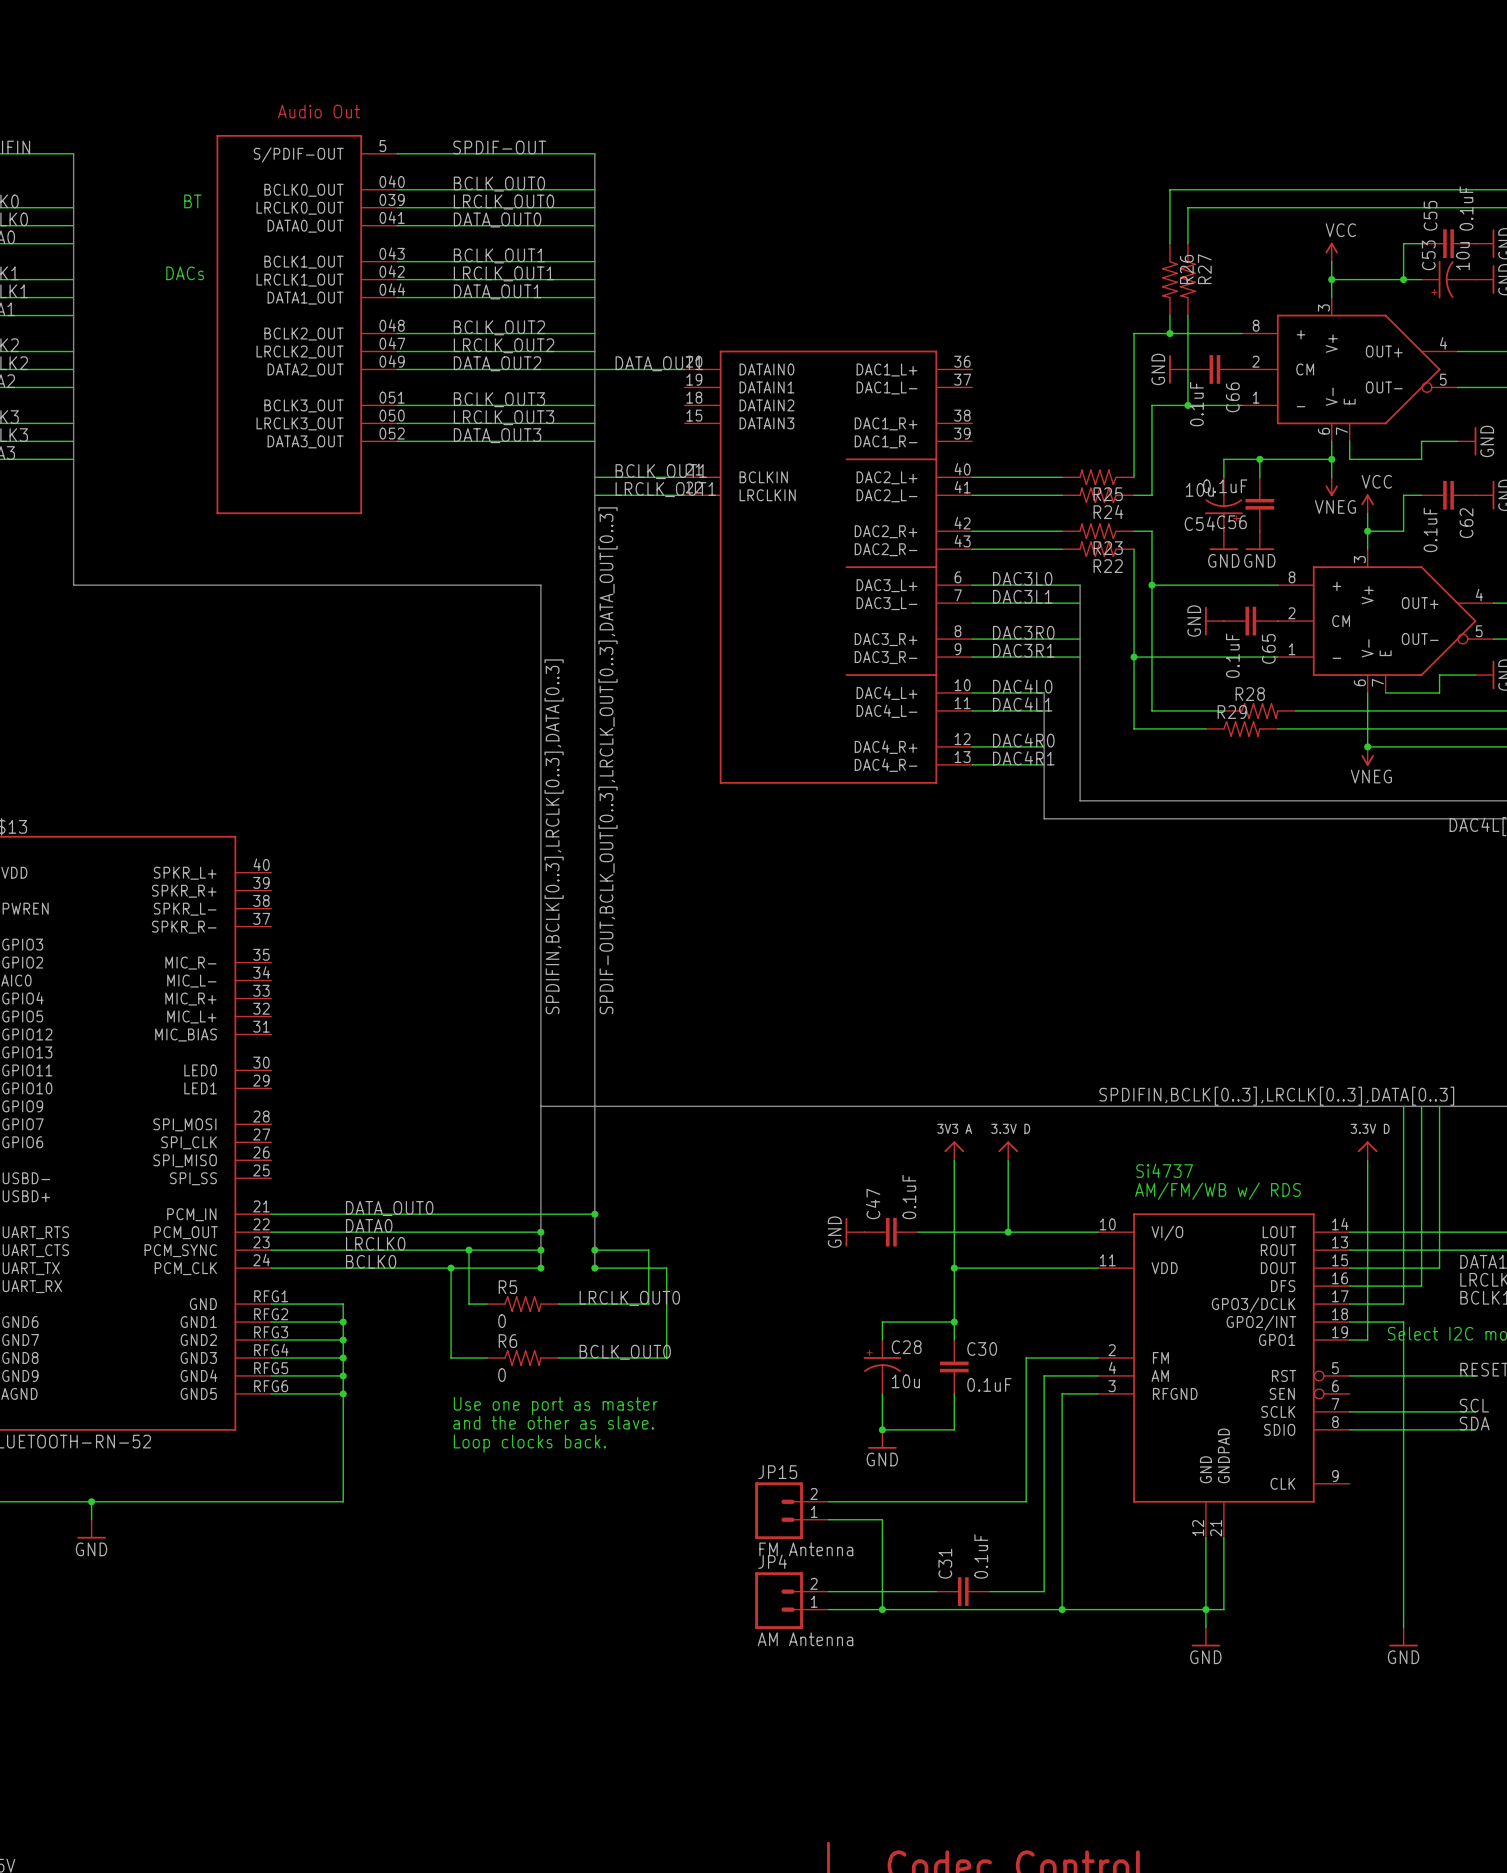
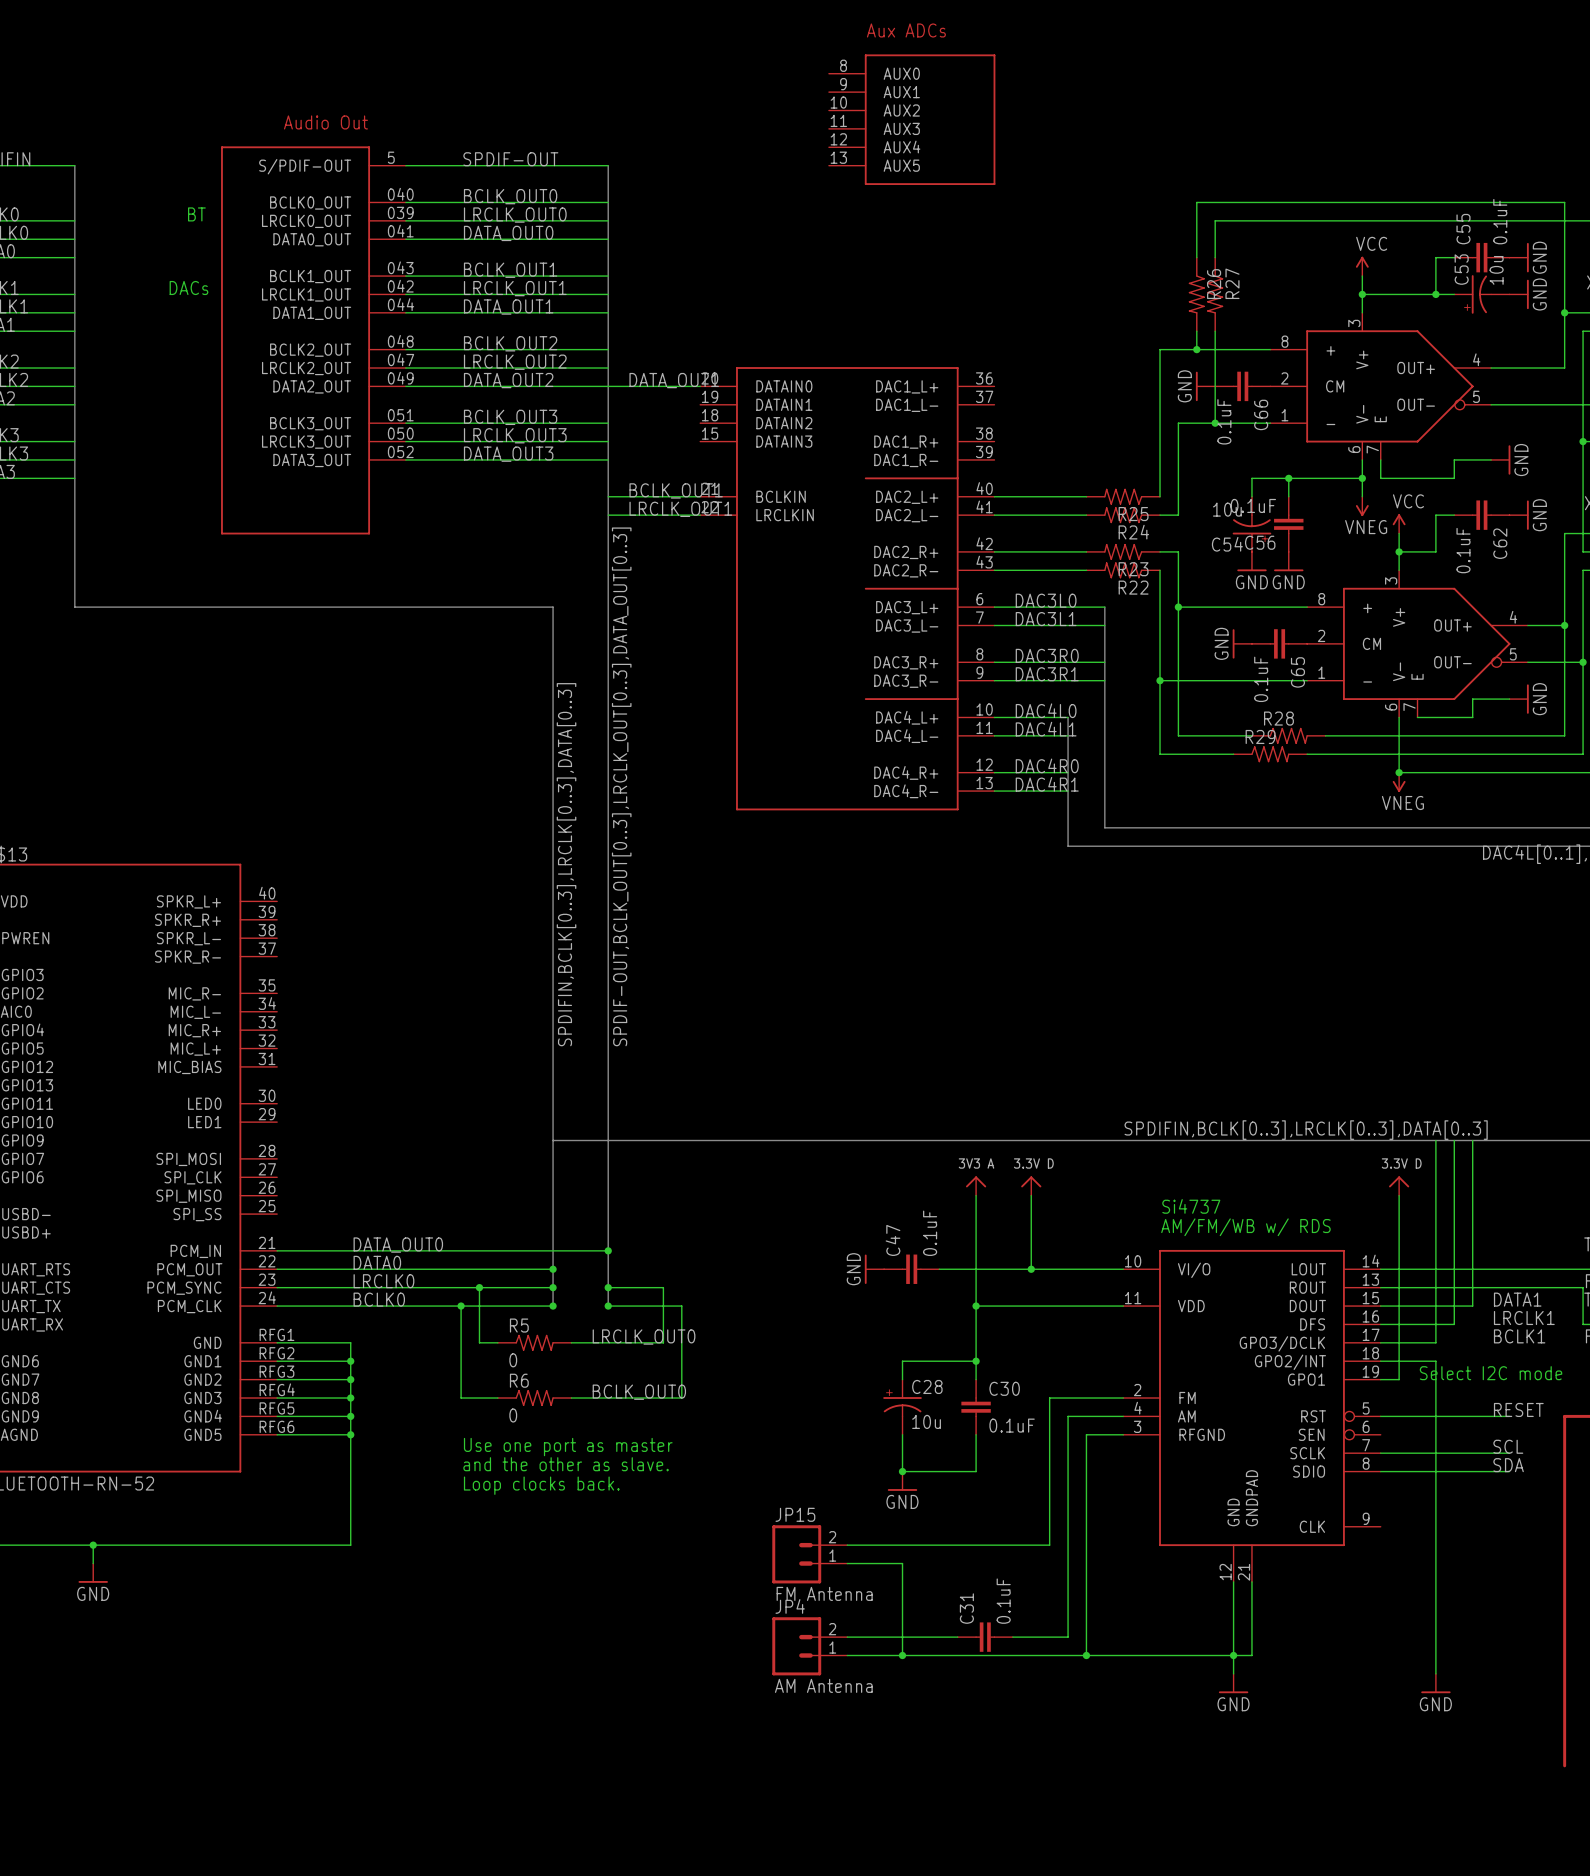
part: none -> (912, 119)

